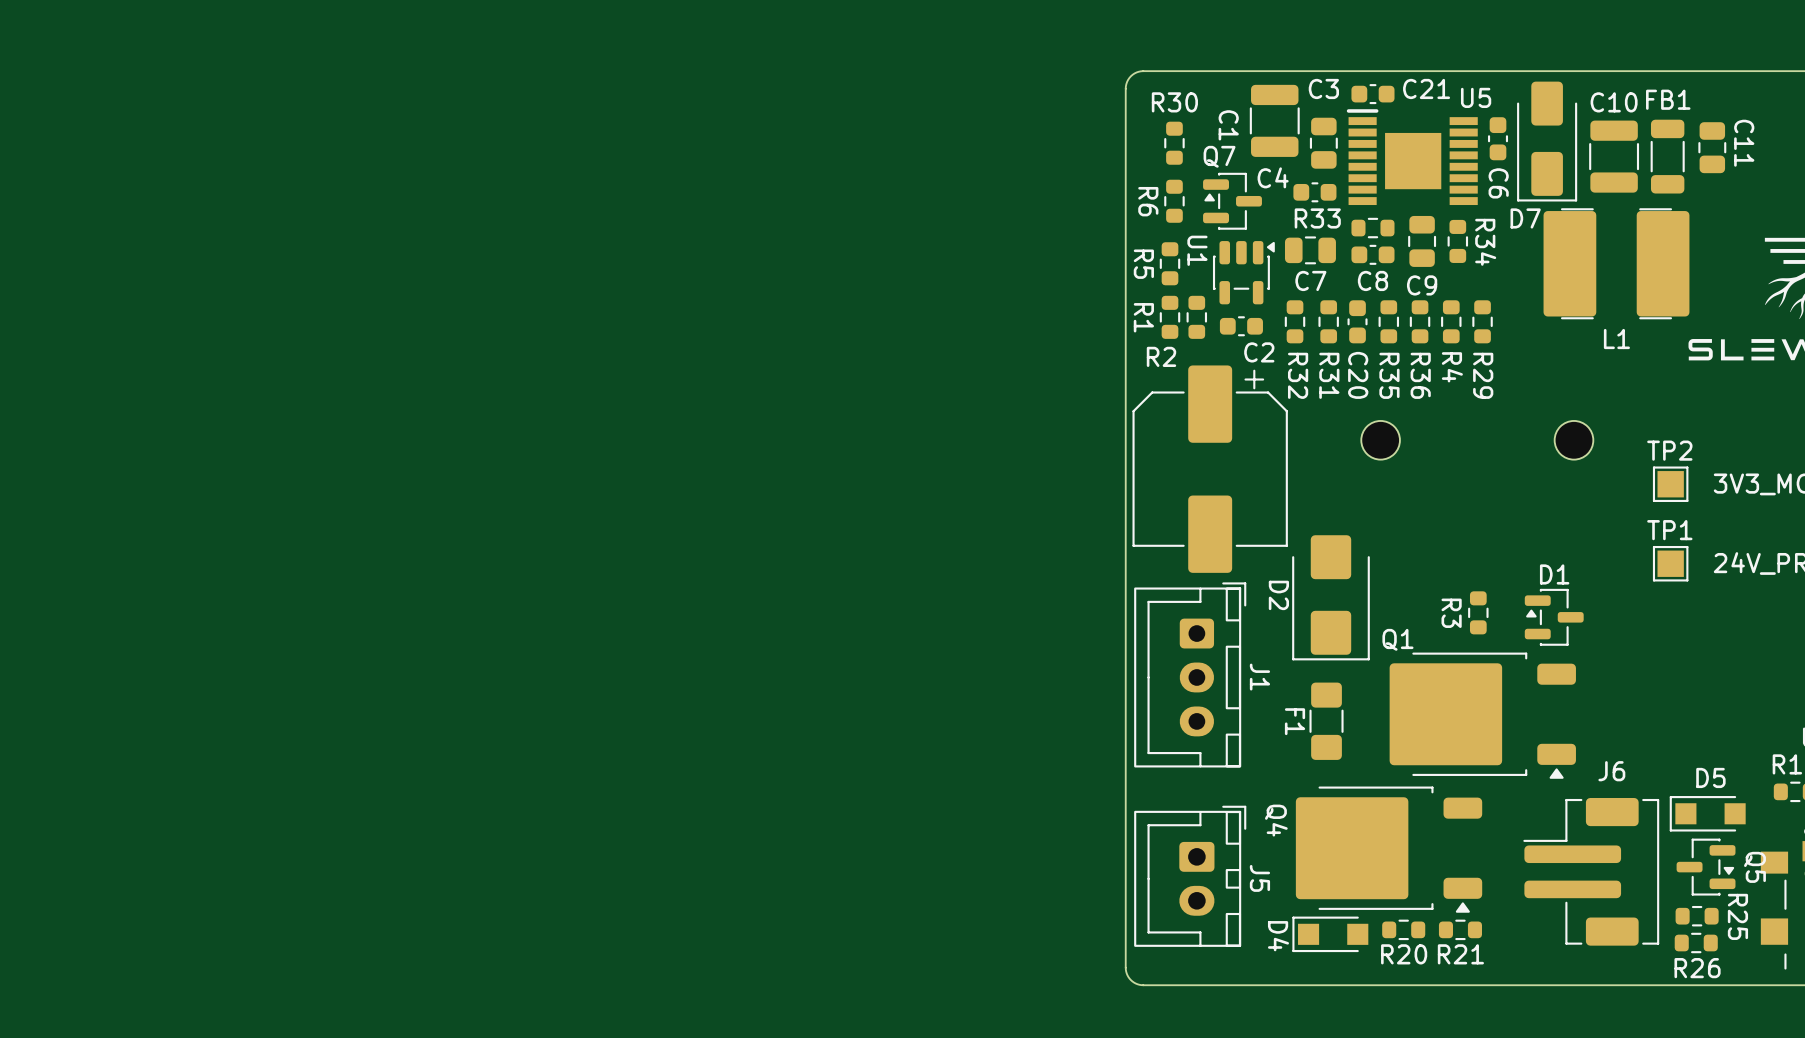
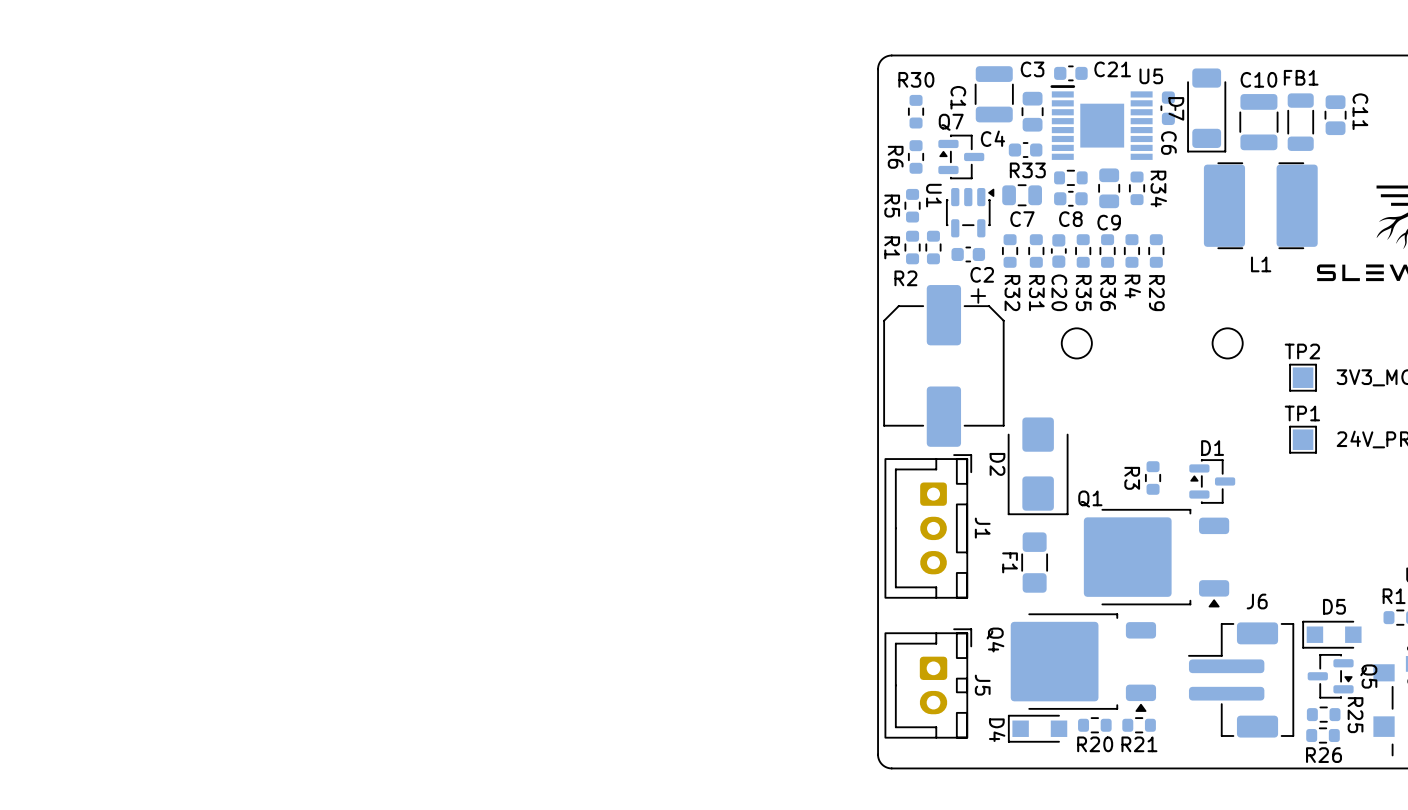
D7 footprint: [1517, 81, 1578, 202] -> [1187, 68, 1227, 153]
D7 name rotation: 0° (1525, 218) -> 90° clockwise (1176, 108)
D7 name position: D7 (1525, 218) -> D7 (1176, 108)

